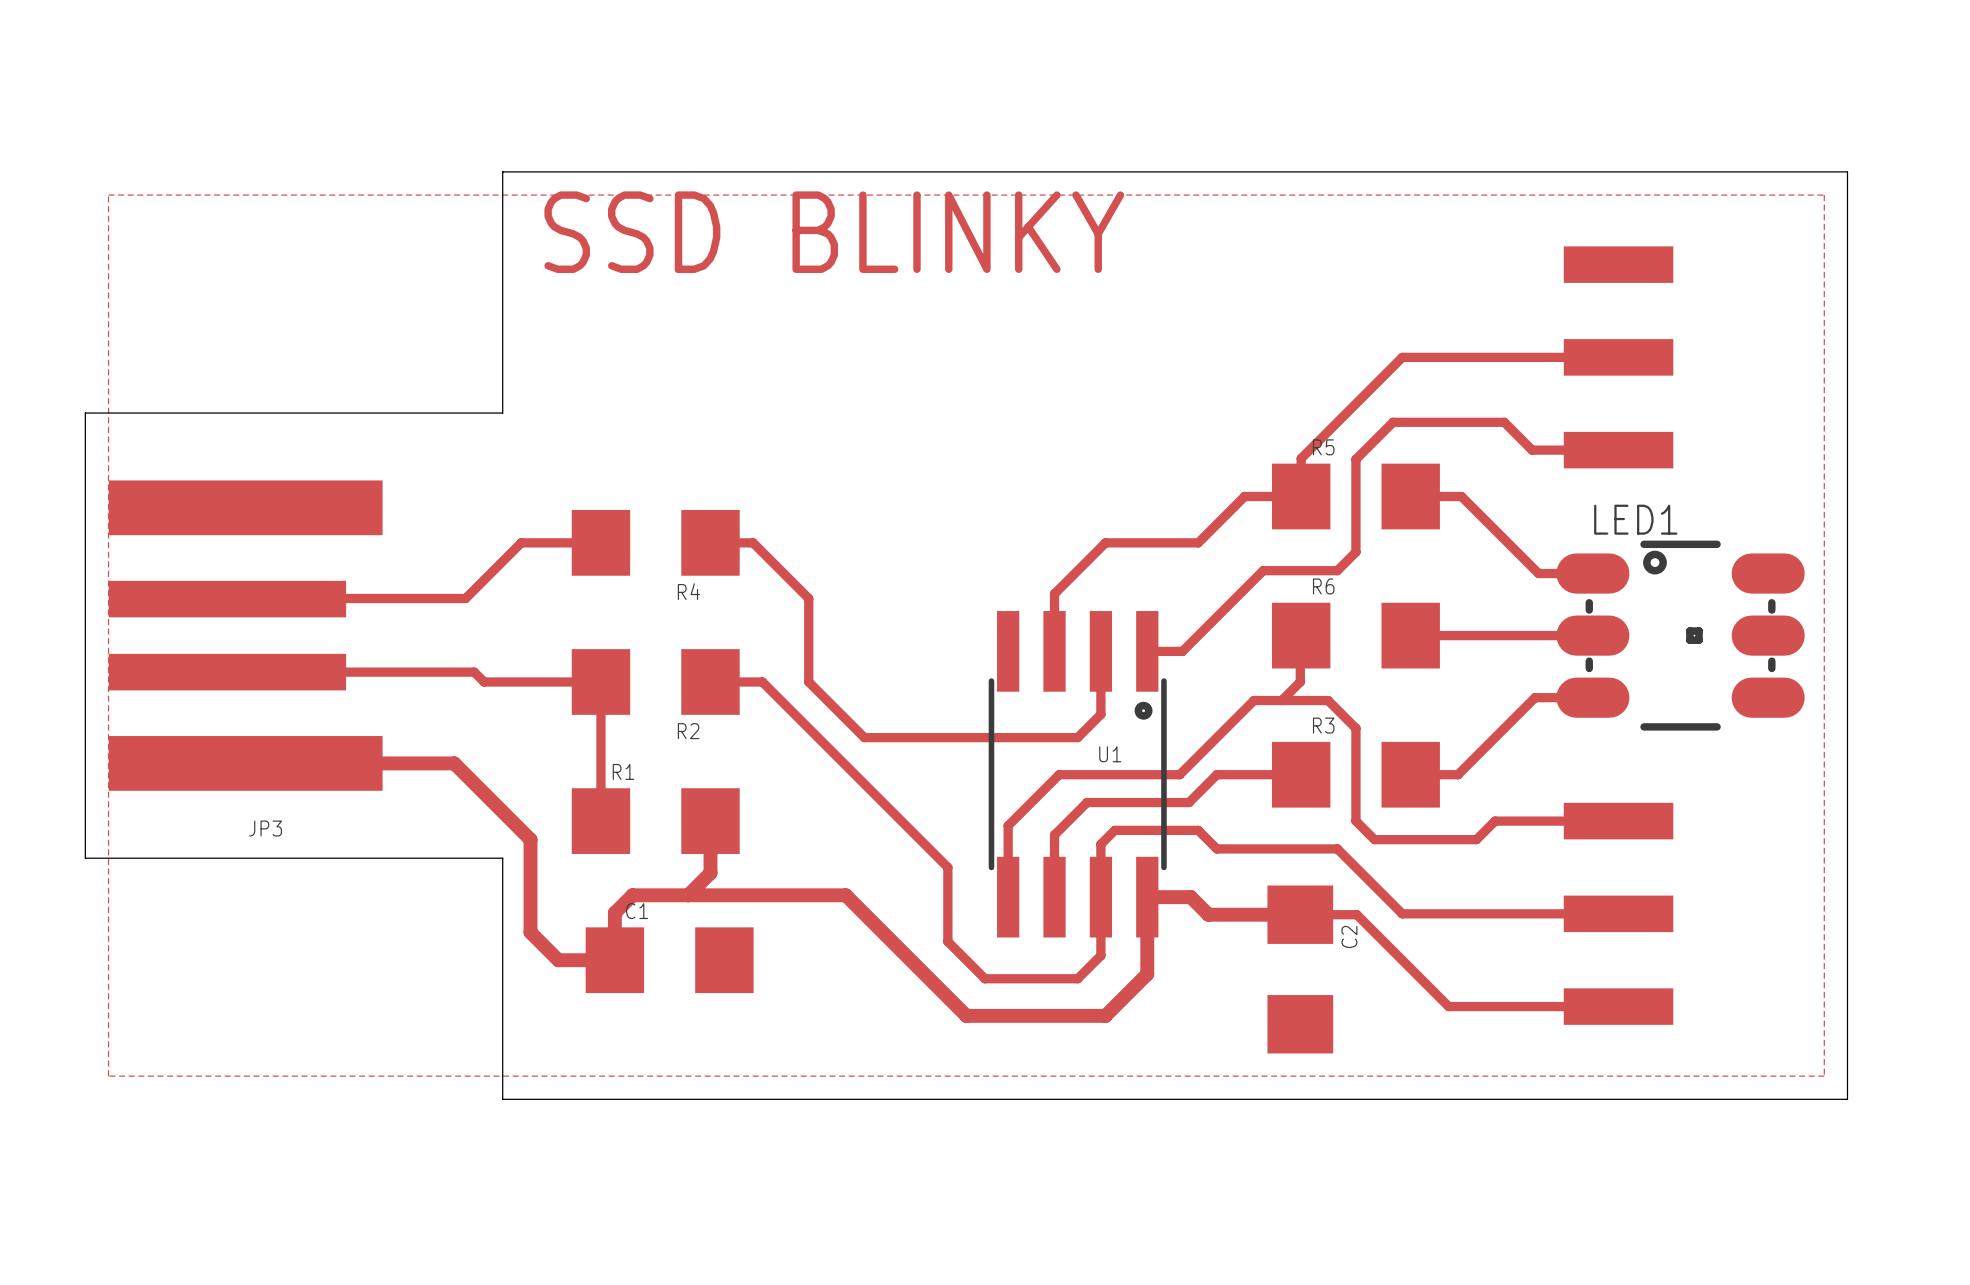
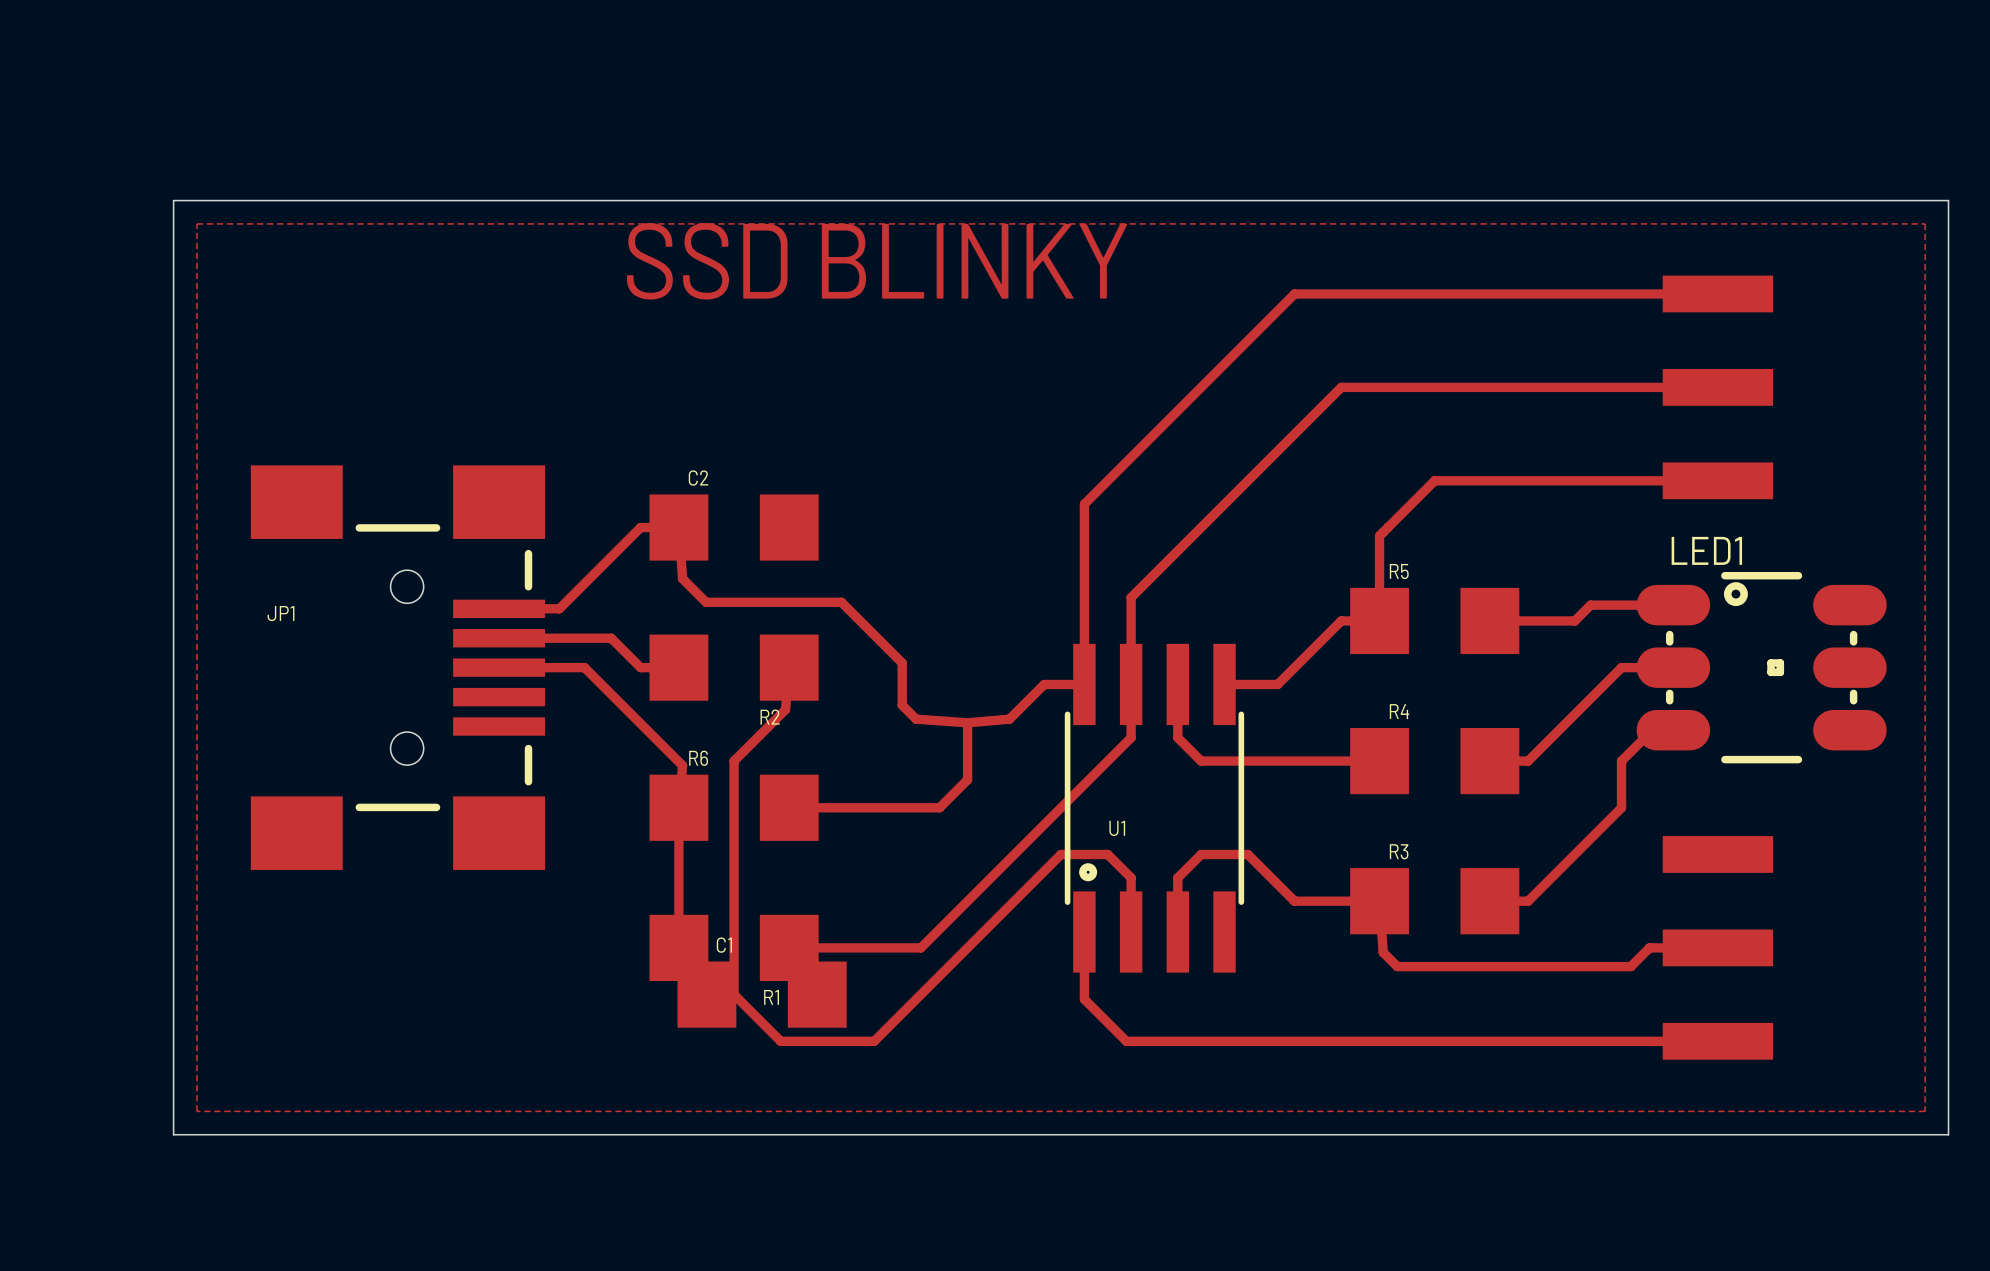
board edge: (502, 171) (502, 413) (85, 413) -> (593, 200) (173, 200) (173, 443)
track: none -> (1717, 293) (1294, 293) (1084, 504) (1084, 684) (1044, 684) (1009, 719) (967, 722)
track: (1402, 357) (1301, 458) (1301, 496) (1244, 496) (1198, 542) (1105, 542) (1054, 593) (1054, 651) -> (1500, 387) (1341, 387) (1131, 597) (1131, 737) (920, 947) (789, 947)
track: (1532, 450) (1504, 422) (1393, 422) (1355, 459) (1355, 552) (1337, 570) (1263, 570) (1244, 589) -> (1630, 480) (1434, 480) (1379, 535) (1379, 620) (1341, 620)
R5 position: (1355, 496) -> (1434, 620)
track: (1410, 496) (1461, 496) (1538, 573) -> (1489, 620) (1574, 620) (1590, 605) (1637, 605)
track: (600, 542) (521, 542) (465, 598) (227, 599) -> none
R4 position: (655, 542) -> (1434, 761)
track: (710, 542) (753, 542) (808, 598) (808, 630) -> (499, 608) (559, 608) (640, 527) (678, 527) (682, 578) (706, 602) (841, 602) (902, 662)
R4 name position: R4 (688, 591) -> R4 (1399, 711)
track: none -> (499, 638) (611, 638) (640, 667) (678, 667)
JP3: (245, 635) -> none
JP1: none -> (397, 667)
track: none -> (499, 667) (584, 667) (682, 765) (678, 807) (678, 947)
track: none -> (789, 667) (785, 709) (734, 761) (734, 994) (780, 1041) (874, 1041) (1061, 854) (1107, 854) (1131, 877) (1131, 932)
track: (1301, 635) (1300, 681) (1281, 700) -> none
R6 position: (1355, 635) -> (734, 807)
track: (1410, 635) (1522, 635) -> (1489, 761) (1528, 761) (1621, 667)
LED1 position: (1680, 635) -> (1761, 667)
track: (1100, 651) (1100, 714) (1077, 737) (864, 737) (808, 681) (808, 672) -> (967, 722) (916, 719) (902, 705)
track: (1147, 651) (1182, 651) -> (1224, 684) (1278, 683)
track: none -> (1177, 684) (1177, 737) (1201, 761) (1379, 761)
track: (227, 672) (474, 672) (484, 681) (600, 681) (600, 821) -> none
R2 position: (655, 681) -> (734, 667)
track: (710, 681) (762, 681) (947, 867) (947, 941) (984, 978) (1077, 978) (1100, 955) (1100, 844) (1114, 830) (1198, 830) (1216, 848) (1337, 848) (1402, 913) (1550, 913) -> (1177, 932) (1177, 877) (1201, 854) (1247, 854) (1294, 901) (1379, 901) (1383, 952) (1397, 966) (1630, 966) (1649, 947)
track: none -> (967, 722) (967, 779) (939, 807) (789, 807)
track: (1553, 697) (1535, 697) (1457, 774) (1410, 774) -> (1652, 730) (1621, 761) (1621, 807) (1528, 901) (1489, 901)
track: (245, 763) (454, 763) (530, 839) (530, 932) (558, 960) (614, 960) (614, 912) (632, 895) (845, 895) (966, 1015) (1105, 1015) (1147, 974) (1147, 897) (1190, 897) (1208, 914) (1356, 914) (1448, 1006) -> (1084, 932) (1084, 999) (1126, 1041) (1546, 1041)
R1 name position: R1 (623, 771) -> R1 (771, 997)
U1 rotation: 0° (1077, 774) -> 180° (1154, 808)
track: (1301, 774) (1216, 774) (1189, 802) (1086, 802) (1054, 835) (1054, 897) -> none
R3 position: (1355, 774) -> (1434, 901)
R1 position: (655, 821) -> (734, 947)
track: (711, 821) (710, 872) (688, 895) -> none
track: (1618, 821) (1495, 821) (1476, 839) (1374, 839) (1355, 821) (1355, 728) (1328, 700) (1253, 700) (1179, 774) (1059, 774) (1008, 825) (1008, 897) -> none
board edge: (85, 858) (502, 858) (502, 1099) -> (173, 891) (173, 1134) (593, 1134)
C2 name position: C2 (1349, 936) -> C2 (698, 478)
C2 rotation: 0° (1300, 969) -> 90° clockwise (734, 527)
C2 position: (1300, 969) -> (734, 527)

